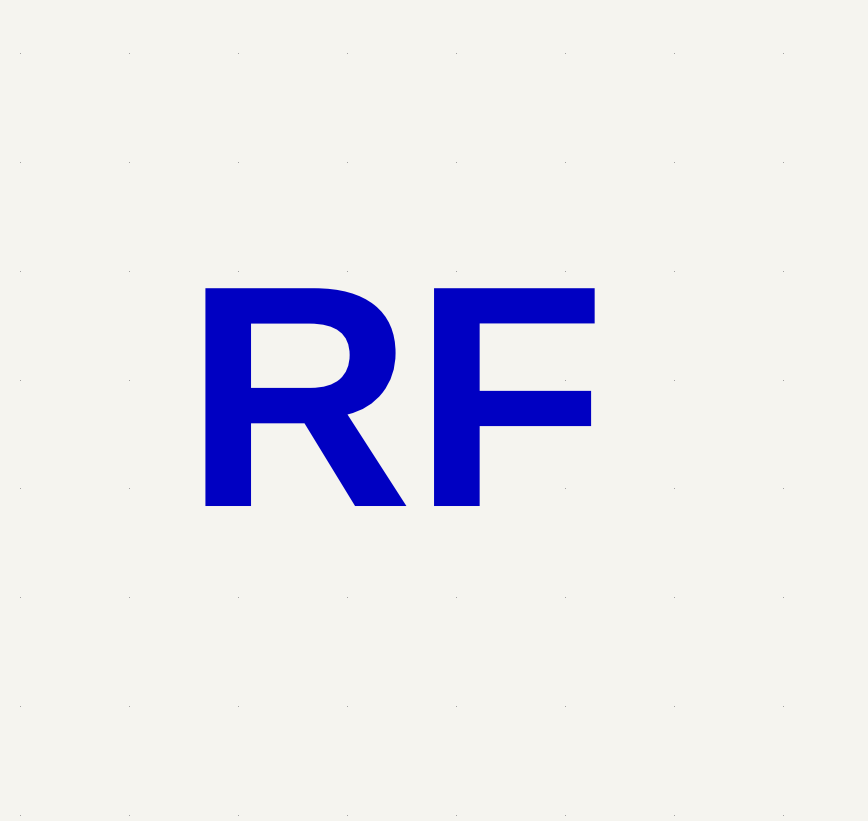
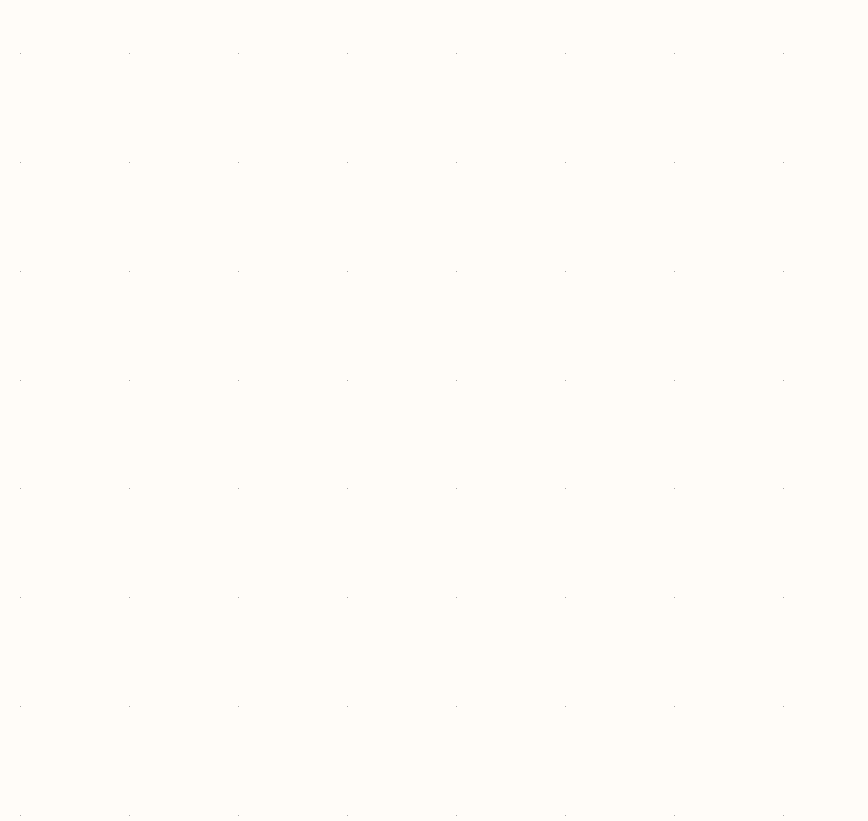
text: RF (400, 397) -> none

